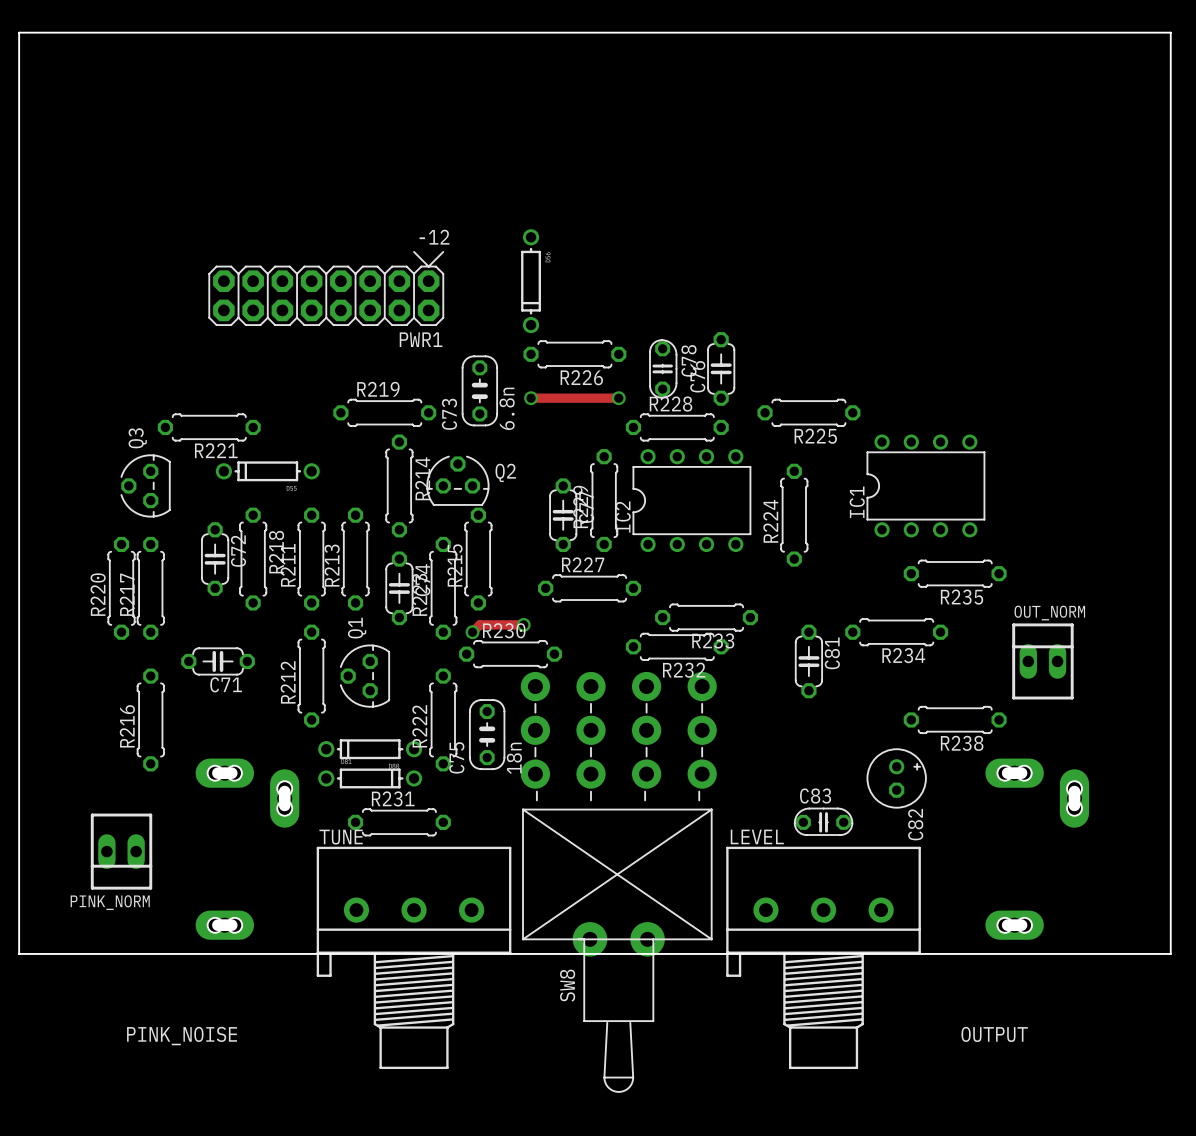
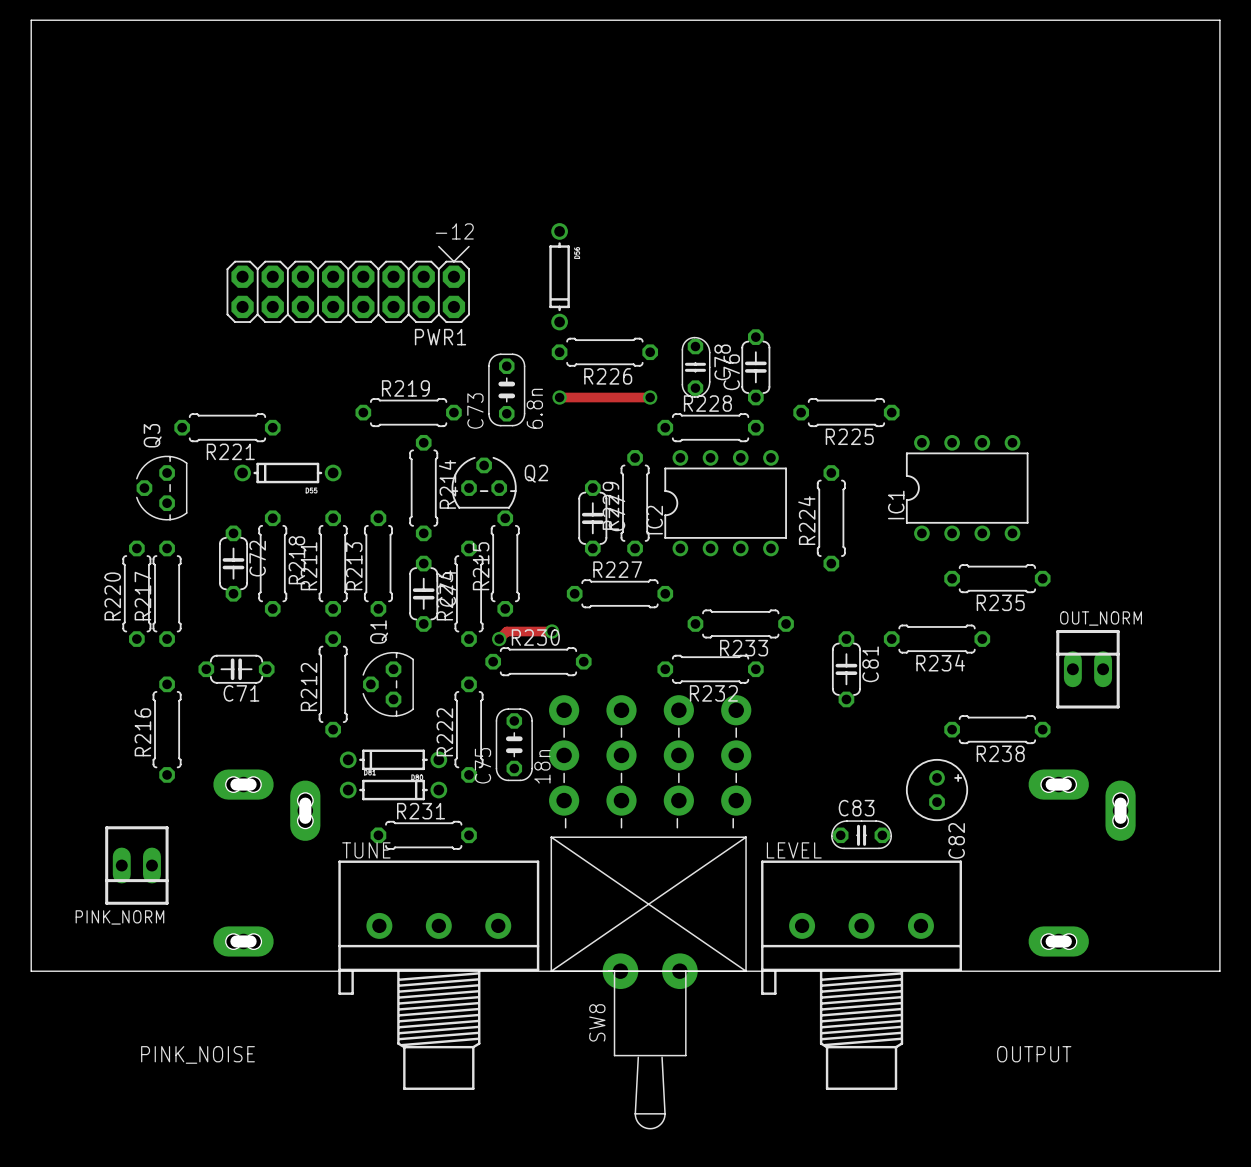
R232 position: (677, 646) -> (710, 669)
SW8 position: (618, 882) -> (650, 912)

